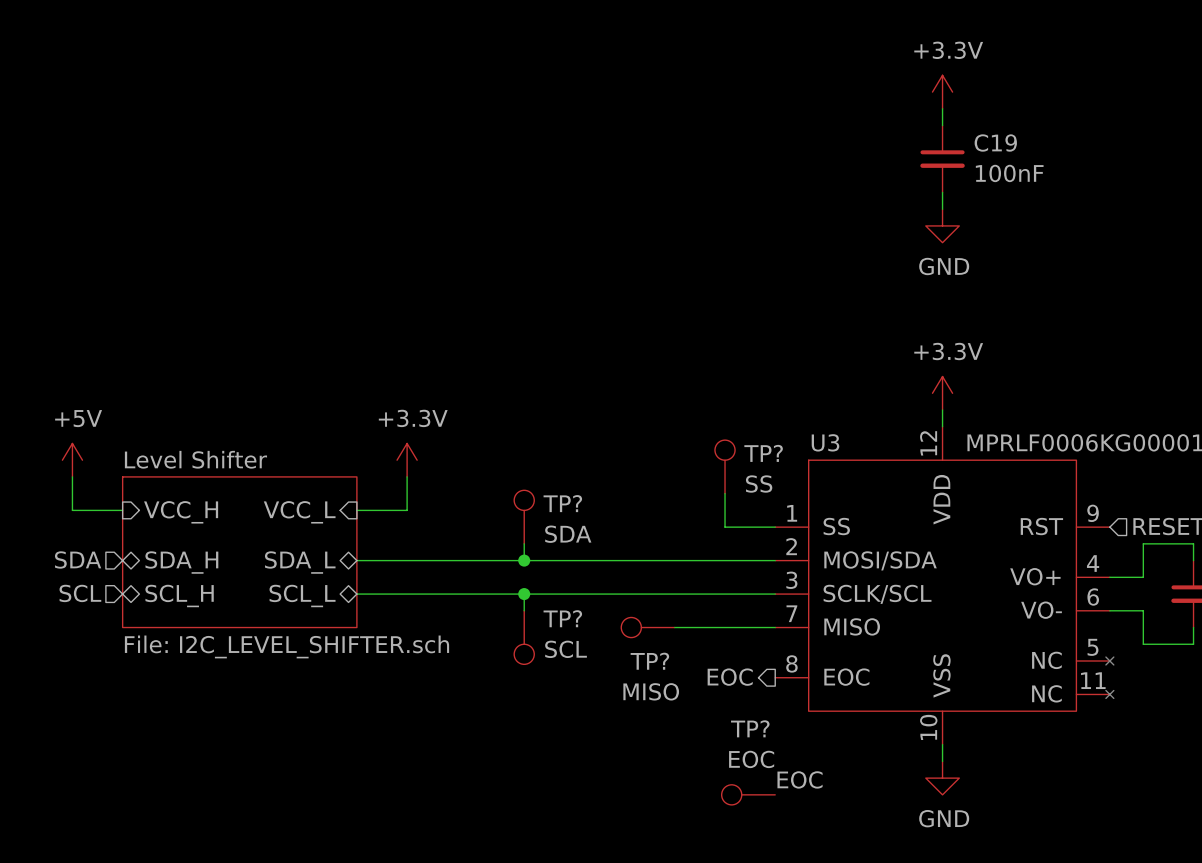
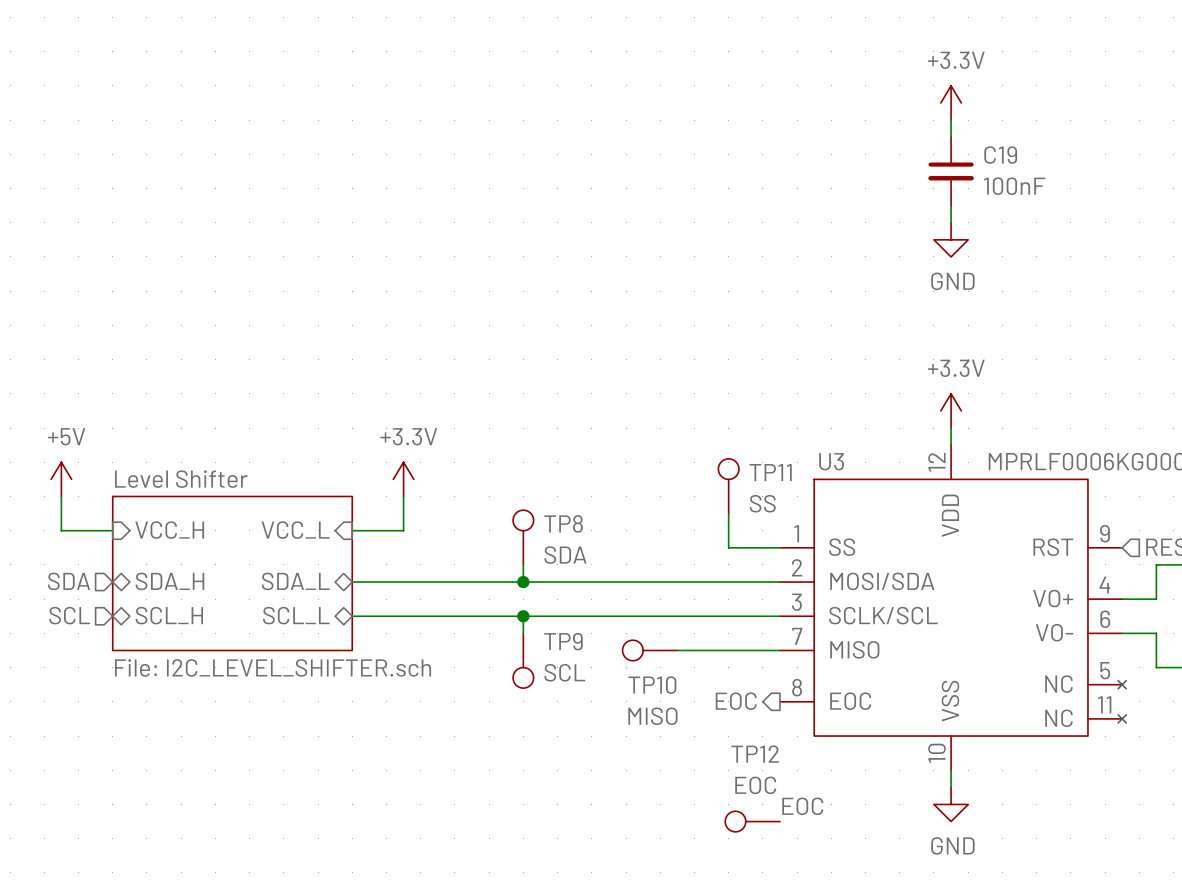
TP? name: TP? (763, 453) -> TP11 (770, 472)
TP? name: TP? (562, 503) -> TP8 (563, 523)
TP? name: TP? (562, 618) -> TP9 (563, 641)
TP? name: TP? (649, 661) -> TP10 (652, 685)
TP? name: TP? (750, 728) -> TP12 (755, 754)

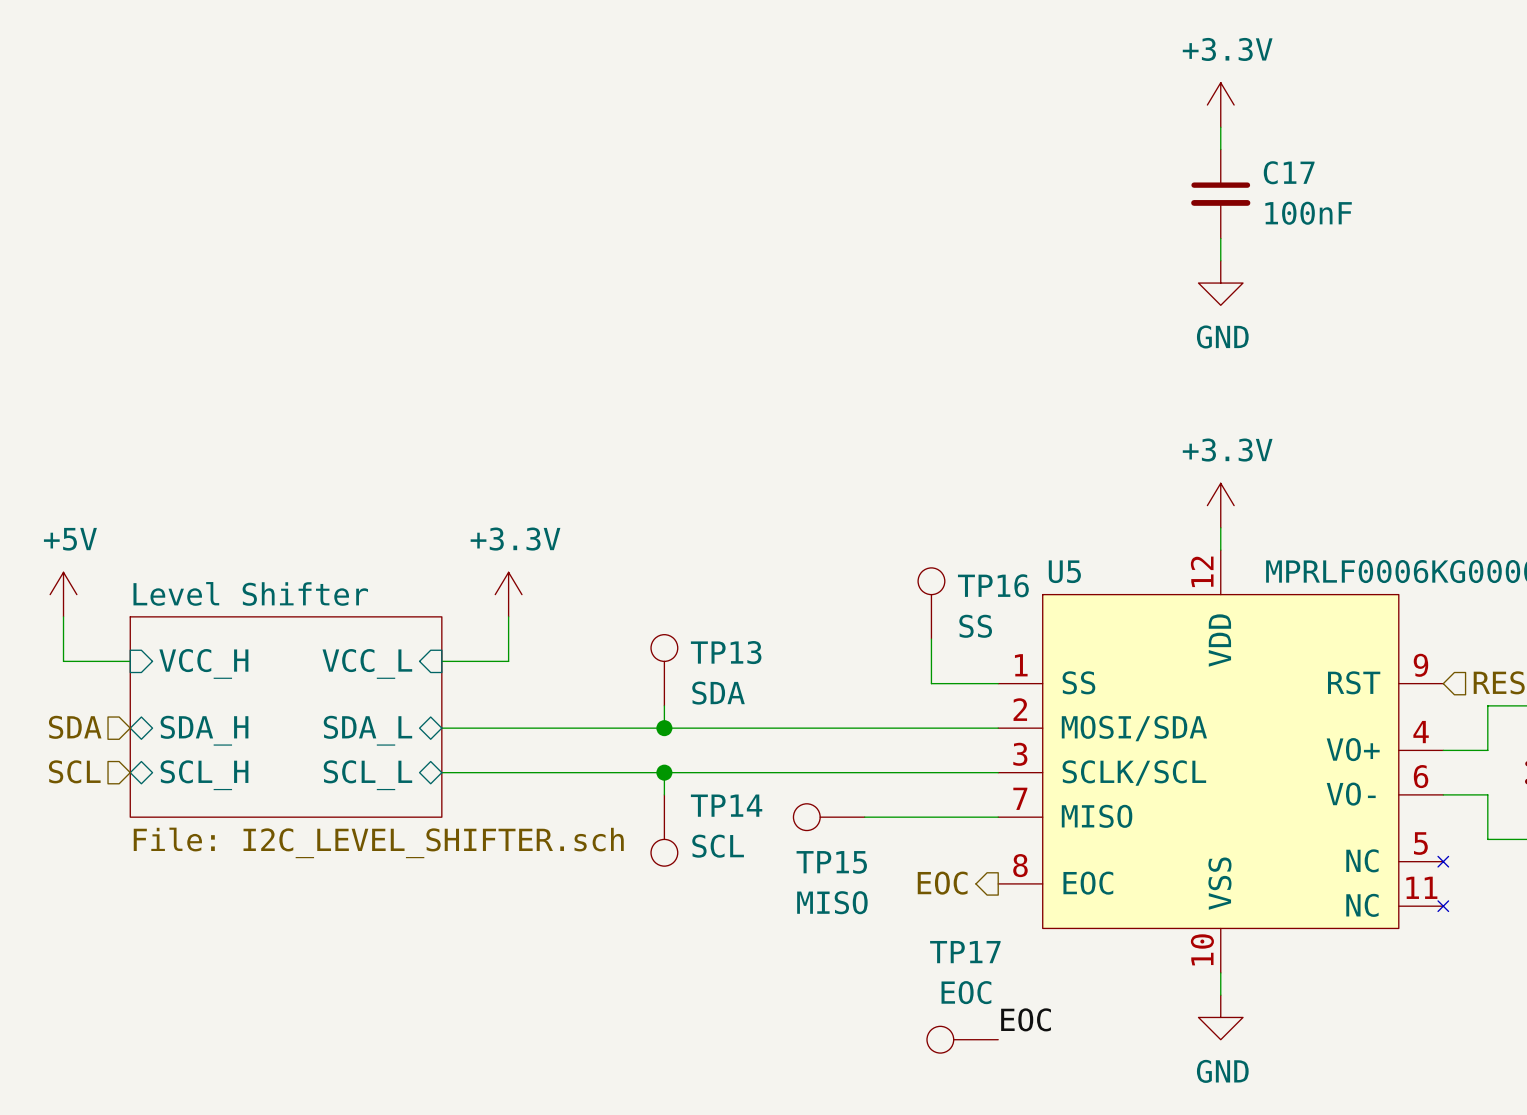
C19 name: C19 (1000, 155) -> C17 (1289, 172)
U3 name: U3 (831, 461) -> U5 (1064, 571)
TP11 name: TP11 (770, 472) -> TP16 (993, 585)
TP8 name: TP8 (563, 523) -> TP13 (726, 652)
TP9 name: TP9 (563, 641) -> TP14 (726, 805)
TP10 name: TP10 (652, 685) -> TP15 (831, 862)
TP12 name: TP12 (755, 754) -> TP17 (965, 952)

